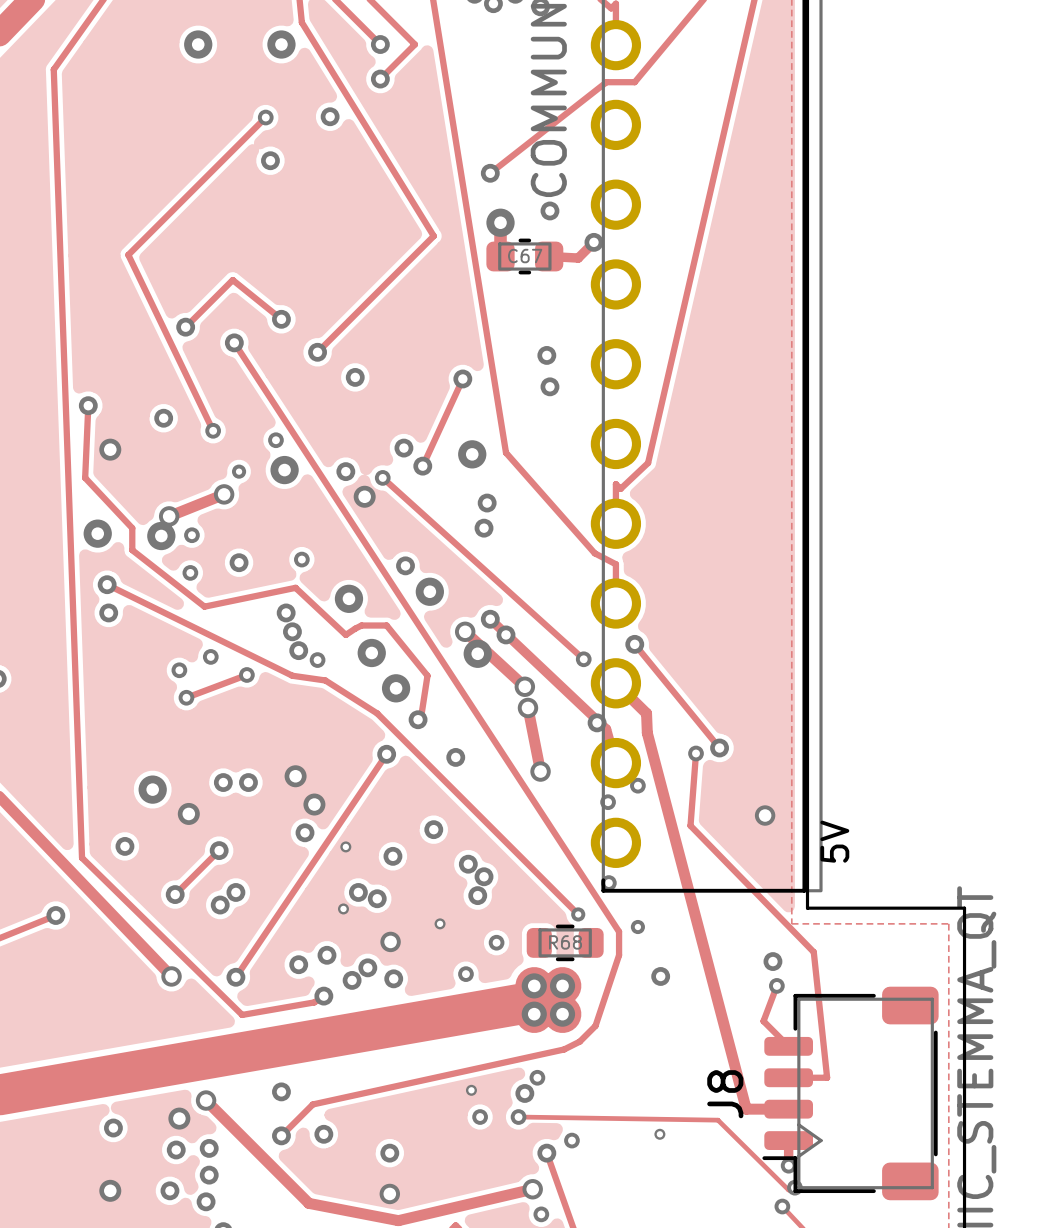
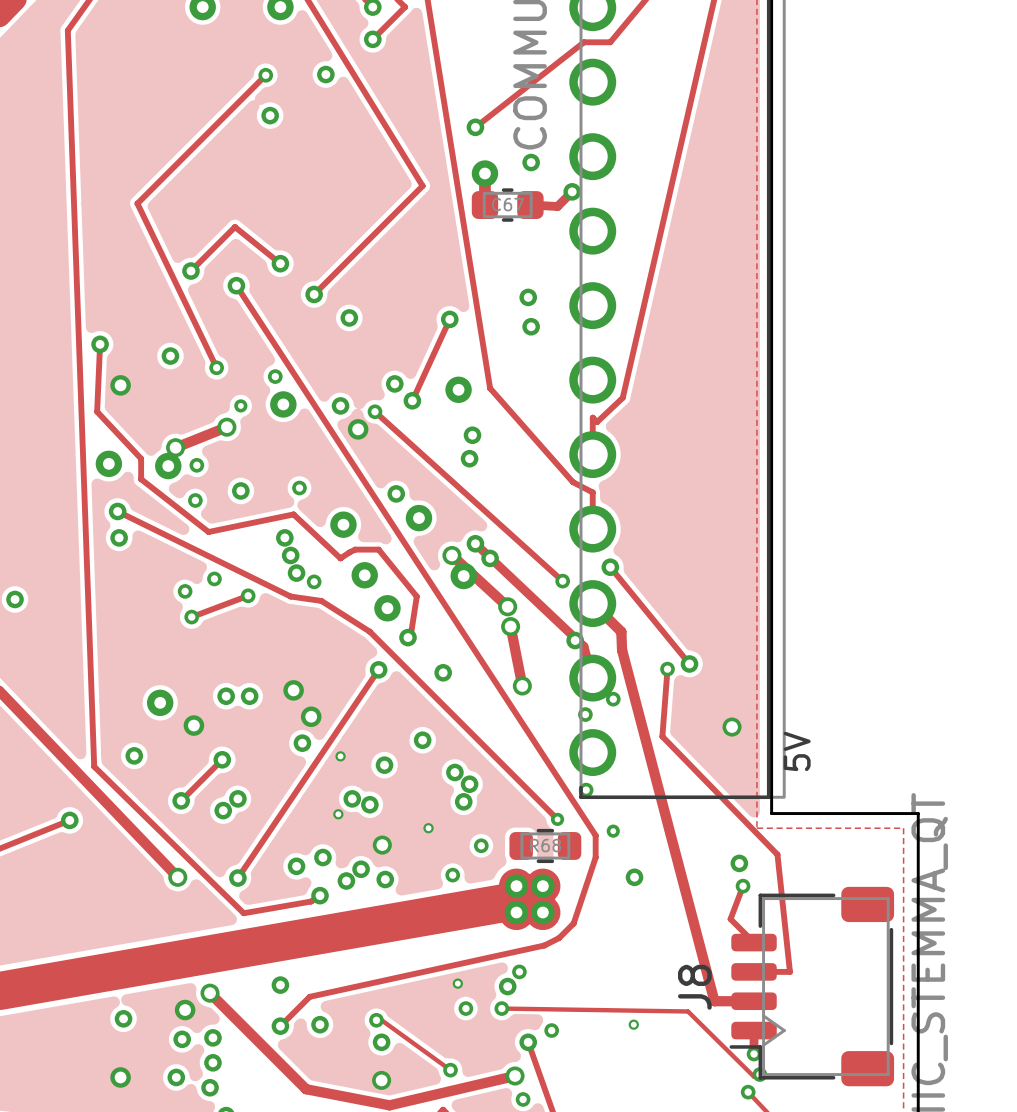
track: none -> (376, 1020) (378, 1018) (450, 1070)
via: none -> (376, 1020)
via: none -> (450, 1070)

